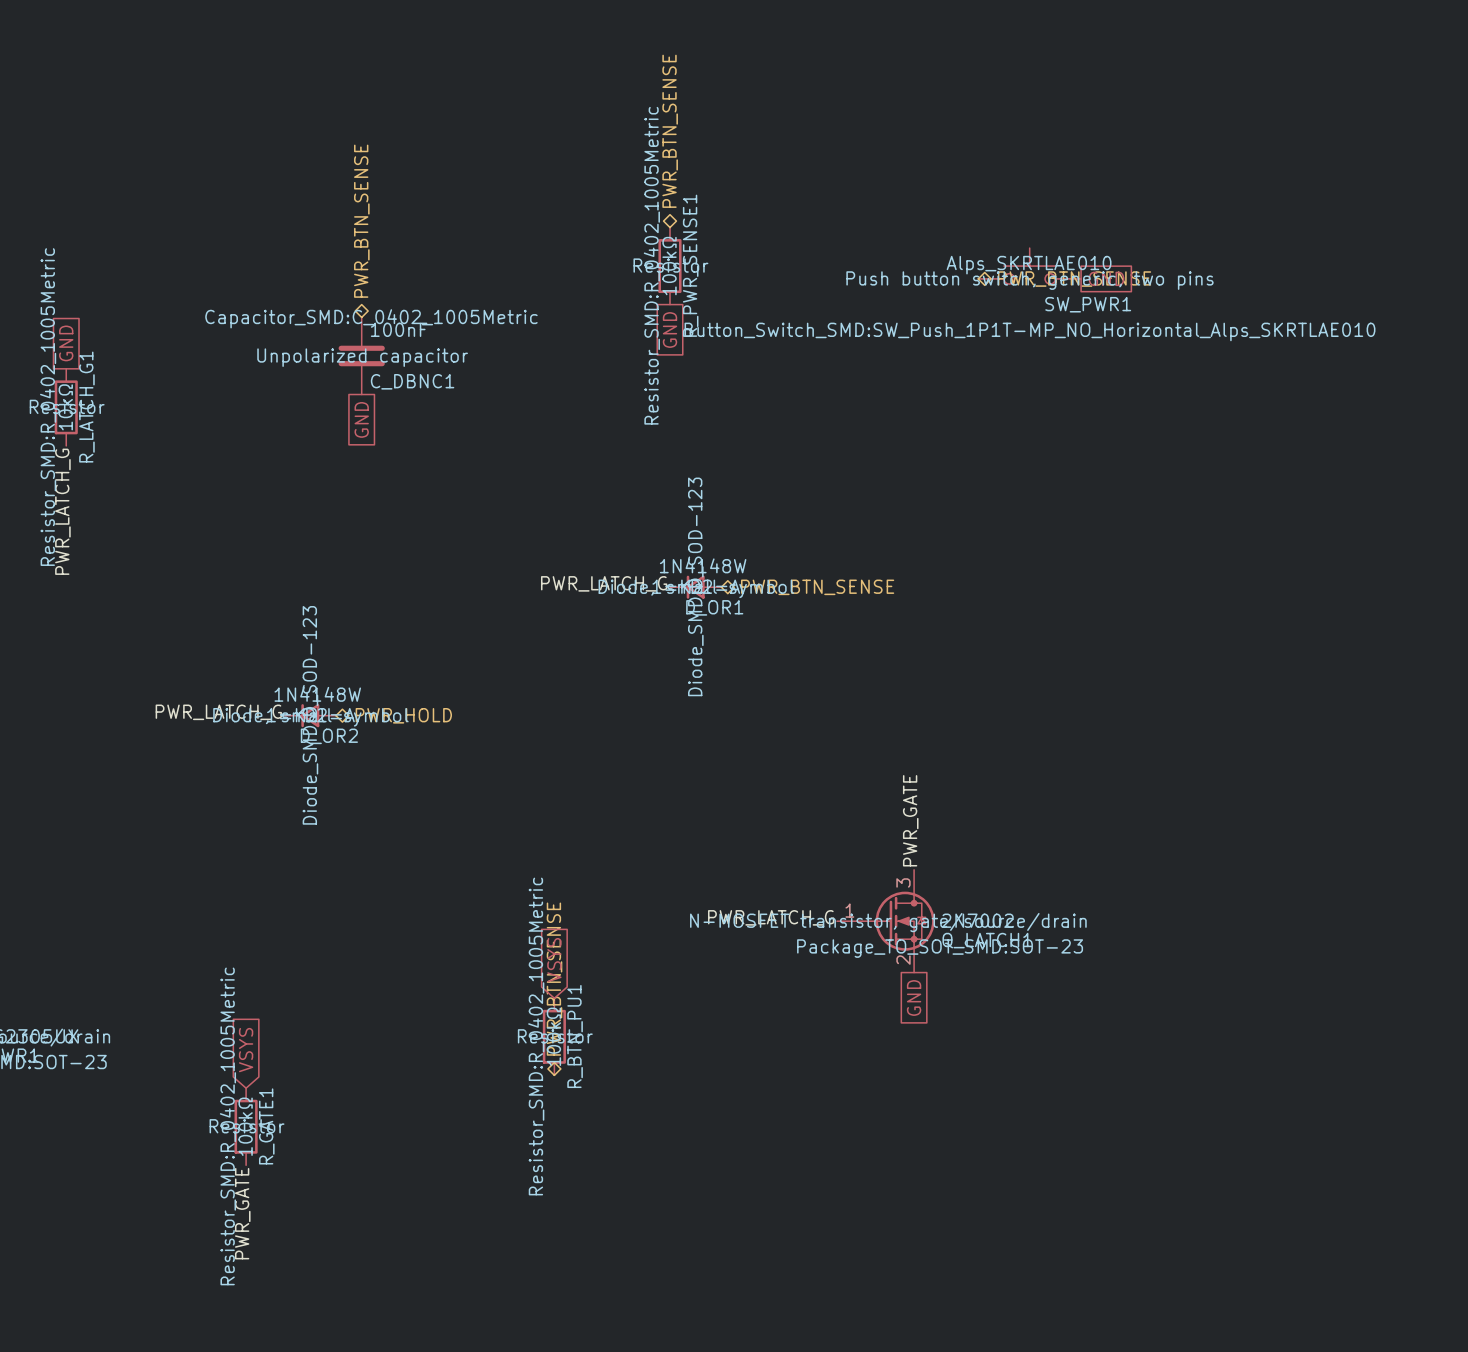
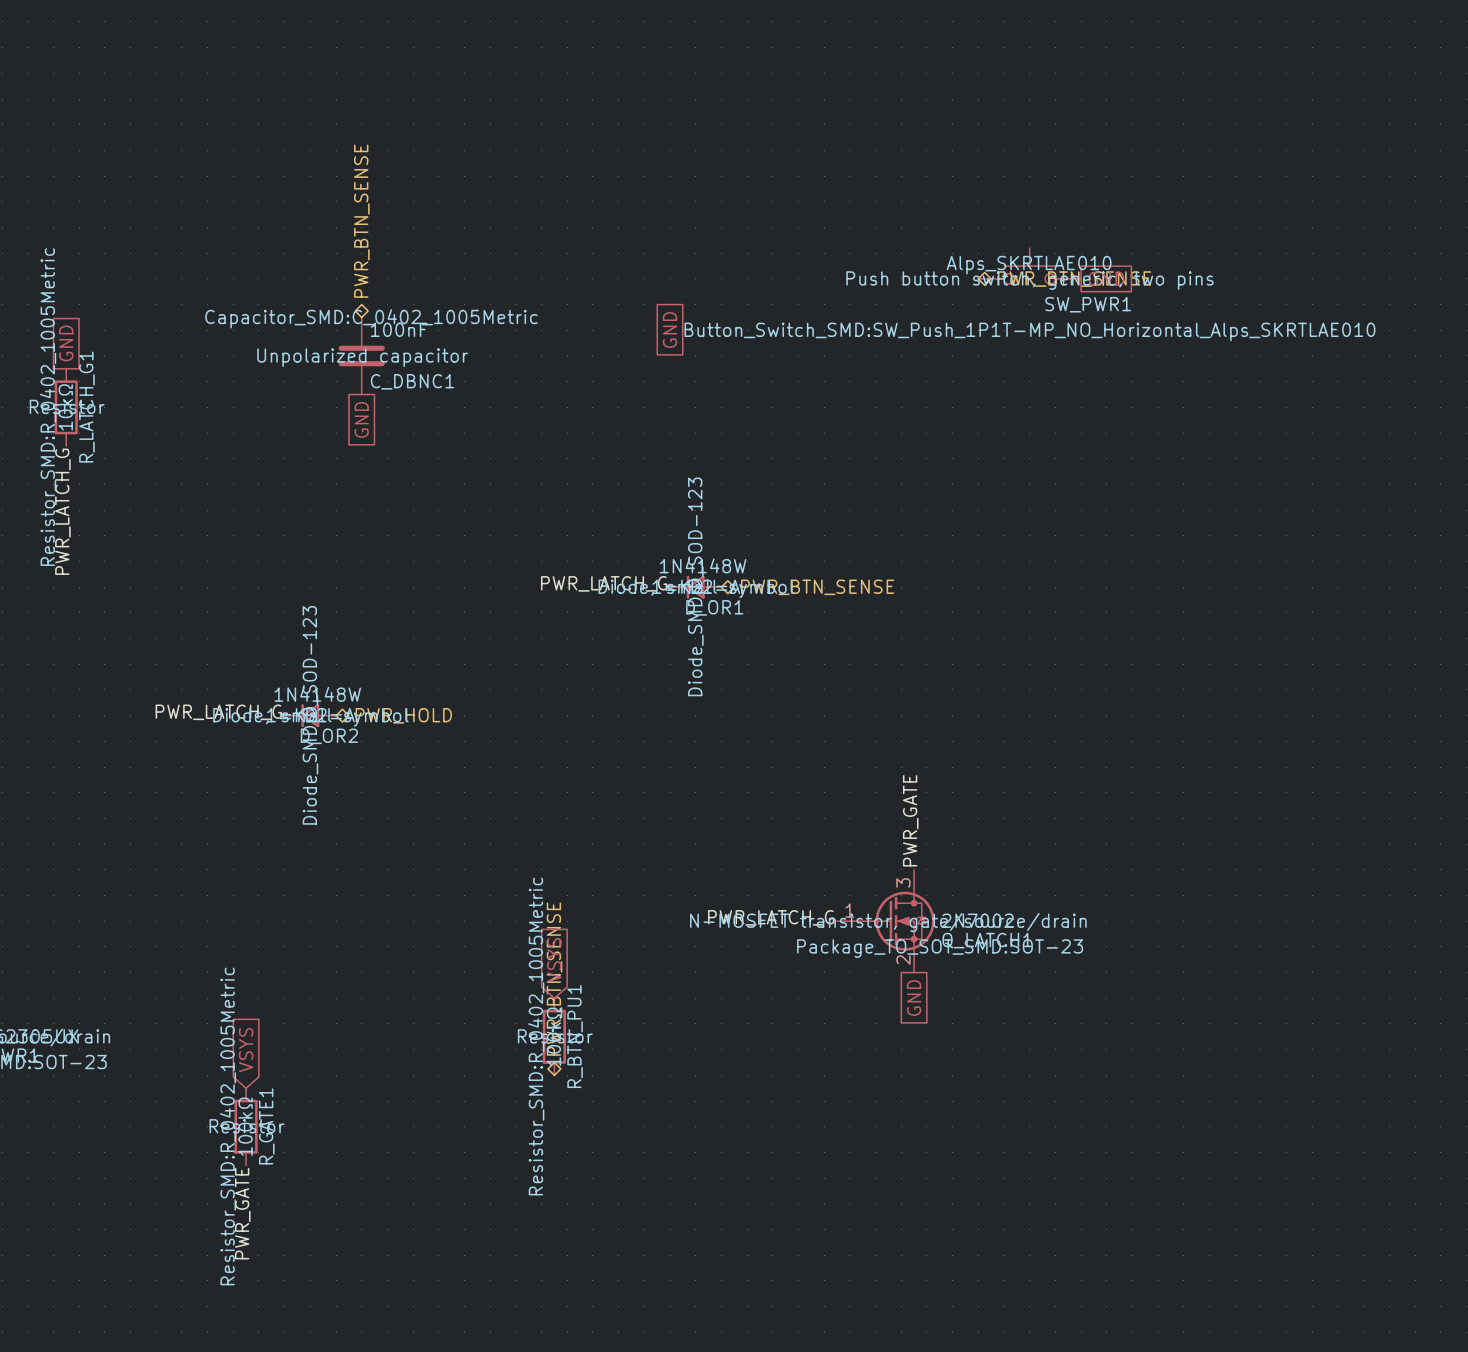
hierarchical label: PWR_BTN_SENSE (670, 131) -> none
R_PWR_SENSE1: 100kΩ (670, 266) -> none

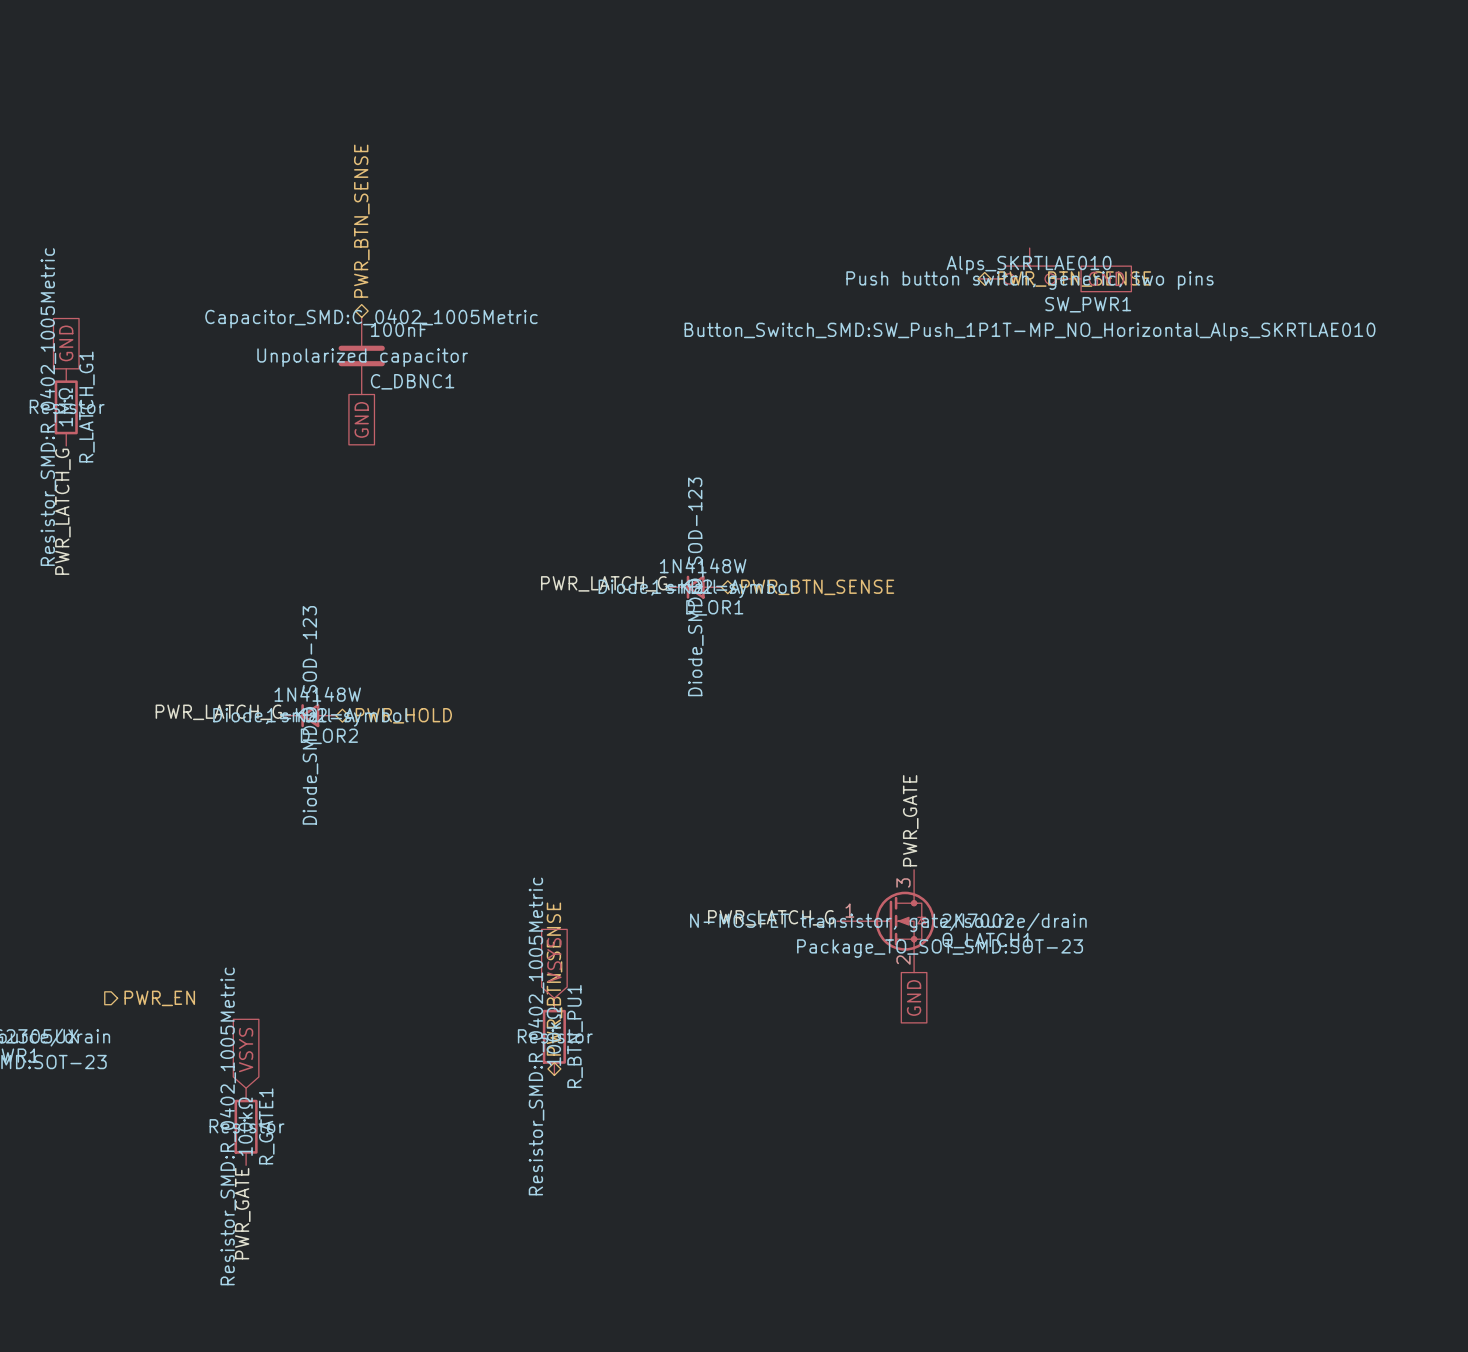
global label: GND (670, 330) -> none
R_LATCH_G1 value: 10kΩ (65, 407) -> 1MΩ (65, 407)
hierarchical label: none -> PWR_EN (159, 998)

